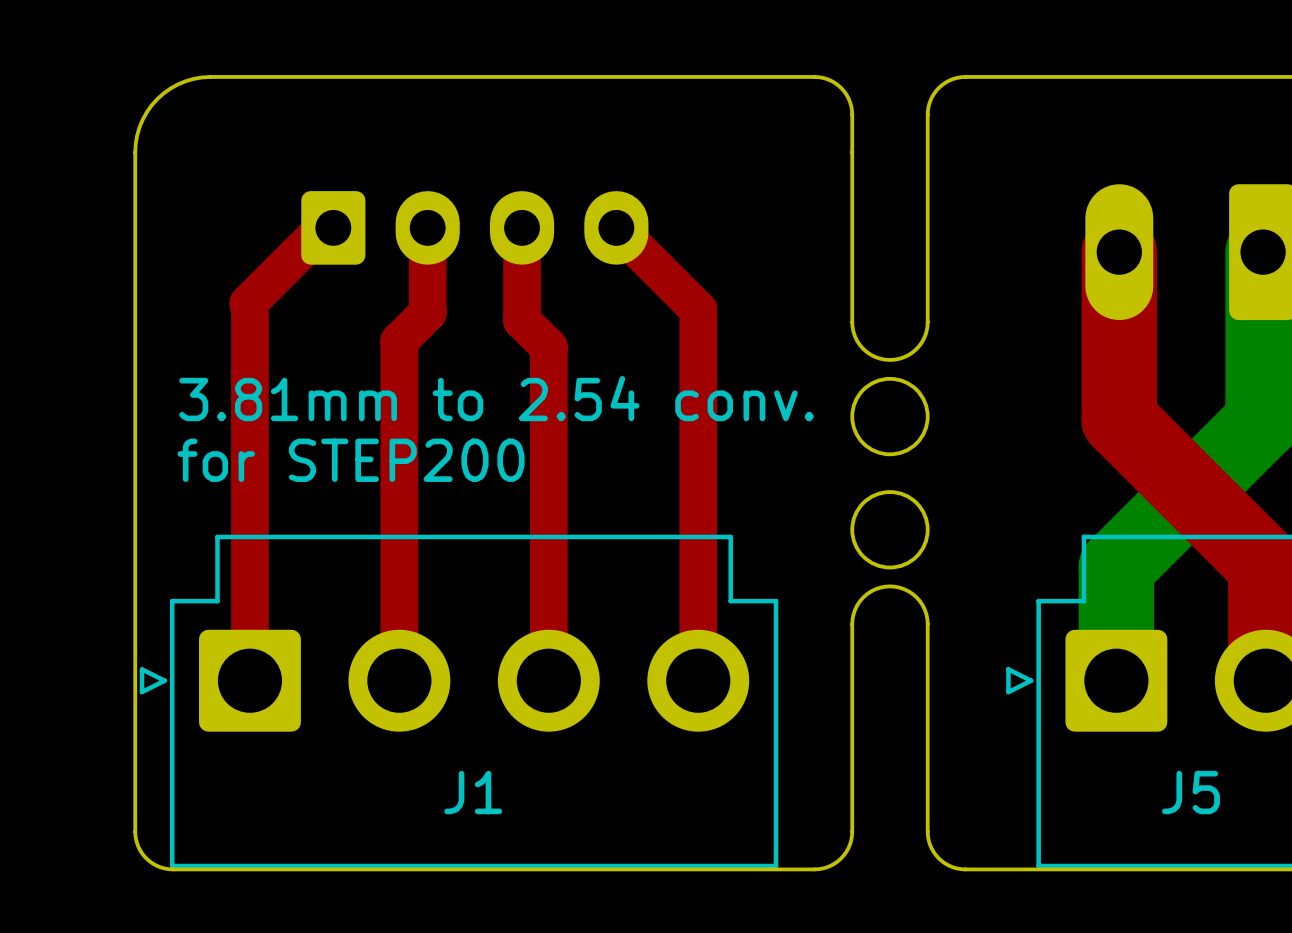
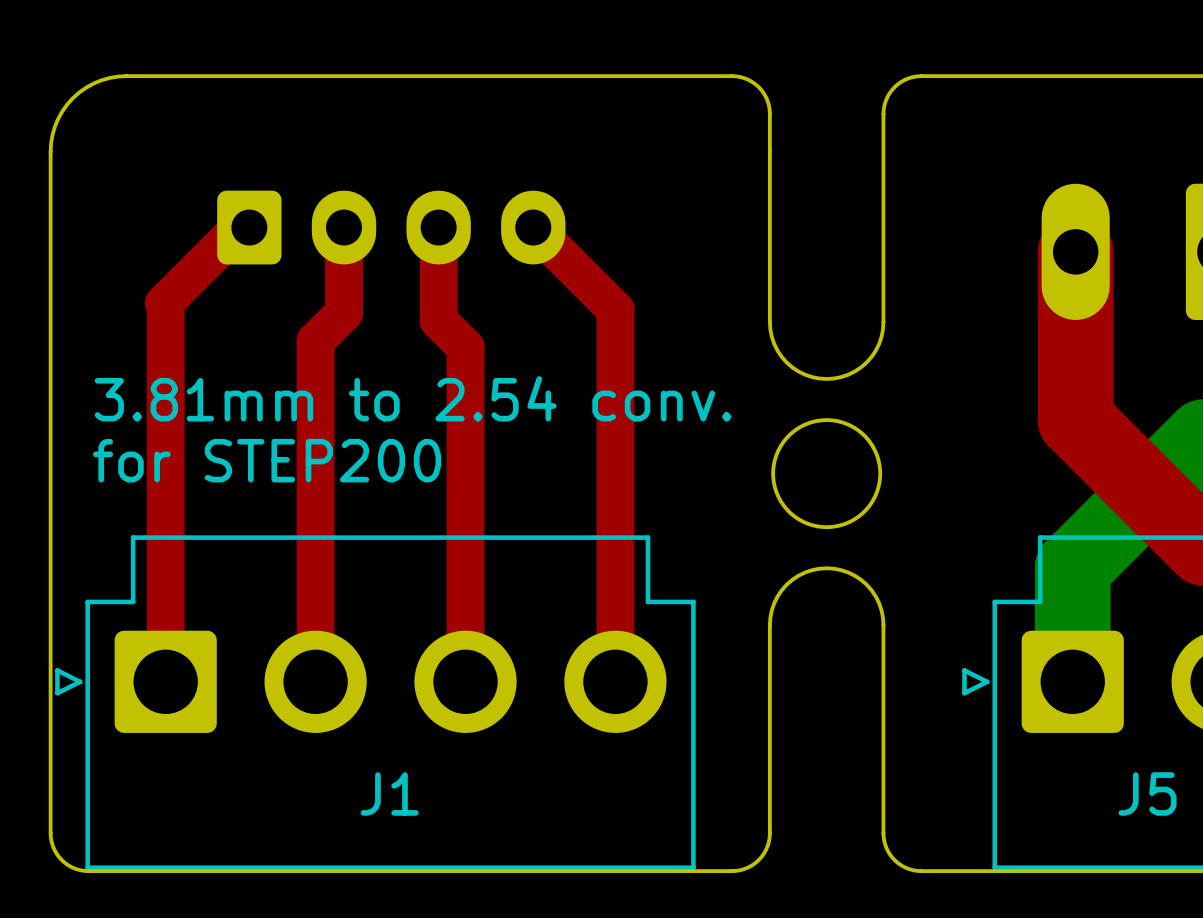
board edge: (210, 76) (185, 81) (170, 88) (157, 99) (142, 119) (137, 135) (135, 152) (135, 831) (137, 844) (146, 858) (156, 865) (172, 869) -> (164, 76) (117, 76) (101, 80) (86, 87) (72, 98) (58, 118) (52, 134) (50, 151) (50, 837) (56, 853) (72, 867) (84, 870) (126, 871)
board edge: (776, 76) (814, 76) (826, 79) (841, 88) (850, 102) (852, 114) (852, 322) (857, 341) (863, 348) (875, 357) (889, 359) (899, 358) (912, 352) (919, 345) (924, 336) (927, 322) -> (732, 76) (744, 78) (755, 84) (766, 97) (769, 109) (769, 322) (771, 336) (777, 350) (792, 367) (804, 374) (819, 378) (841, 377) (861, 367) (871, 356) (879, 343) (883, 322)
top track: (333, 227) (323, 227) (248, 303) (249, 304) (249, 680) -> (249, 227) (239, 227) (164, 303) (165, 304) (165, 681)
top track: (427, 227) (427, 312) (399, 341) (399, 680) -> (344, 227) (344, 312) (315, 341) (315, 681)
part position: (474, 227) -> (391, 227)
top track: (522, 227) (522, 320) (548, 347) (548, 680) -> (438, 227) (438, 320) (465, 347) (465, 681)
top track: (616, 227) (698, 309) (698, 680) -> (533, 227) (615, 309) (615, 681)
round board edge: [850, 376, 930, 457] -> none
text position: 3.81mm to 2.54 conv. (496, 398) -> 3.81mm to 2.54 conv. (413, 398)
round board edge: none -> [771, 418, 883, 530]
text position: for STEP200 (351, 460) -> for STEP200 (267, 460)
round board edge: [850, 490, 930, 570] -> none
board edge: (927, 624) (924, 609) (919, 601) (912, 594) (899, 587) (889, 586) (875, 589) (863, 597) (857, 605) (852, 624) (852, 831) (850, 844) (841, 858) (826, 867) (814, 869) (776, 869) -> (883, 625) (879, 603) (871, 590) (861, 579) (841, 570) (819, 568) (804, 572) (792, 579) (777, 596) (771, 610) (769, 625) (769, 837) (766, 849) (755, 862) (744, 868) (732, 871)
J1 position: (459, 701) -> (375, 702)

